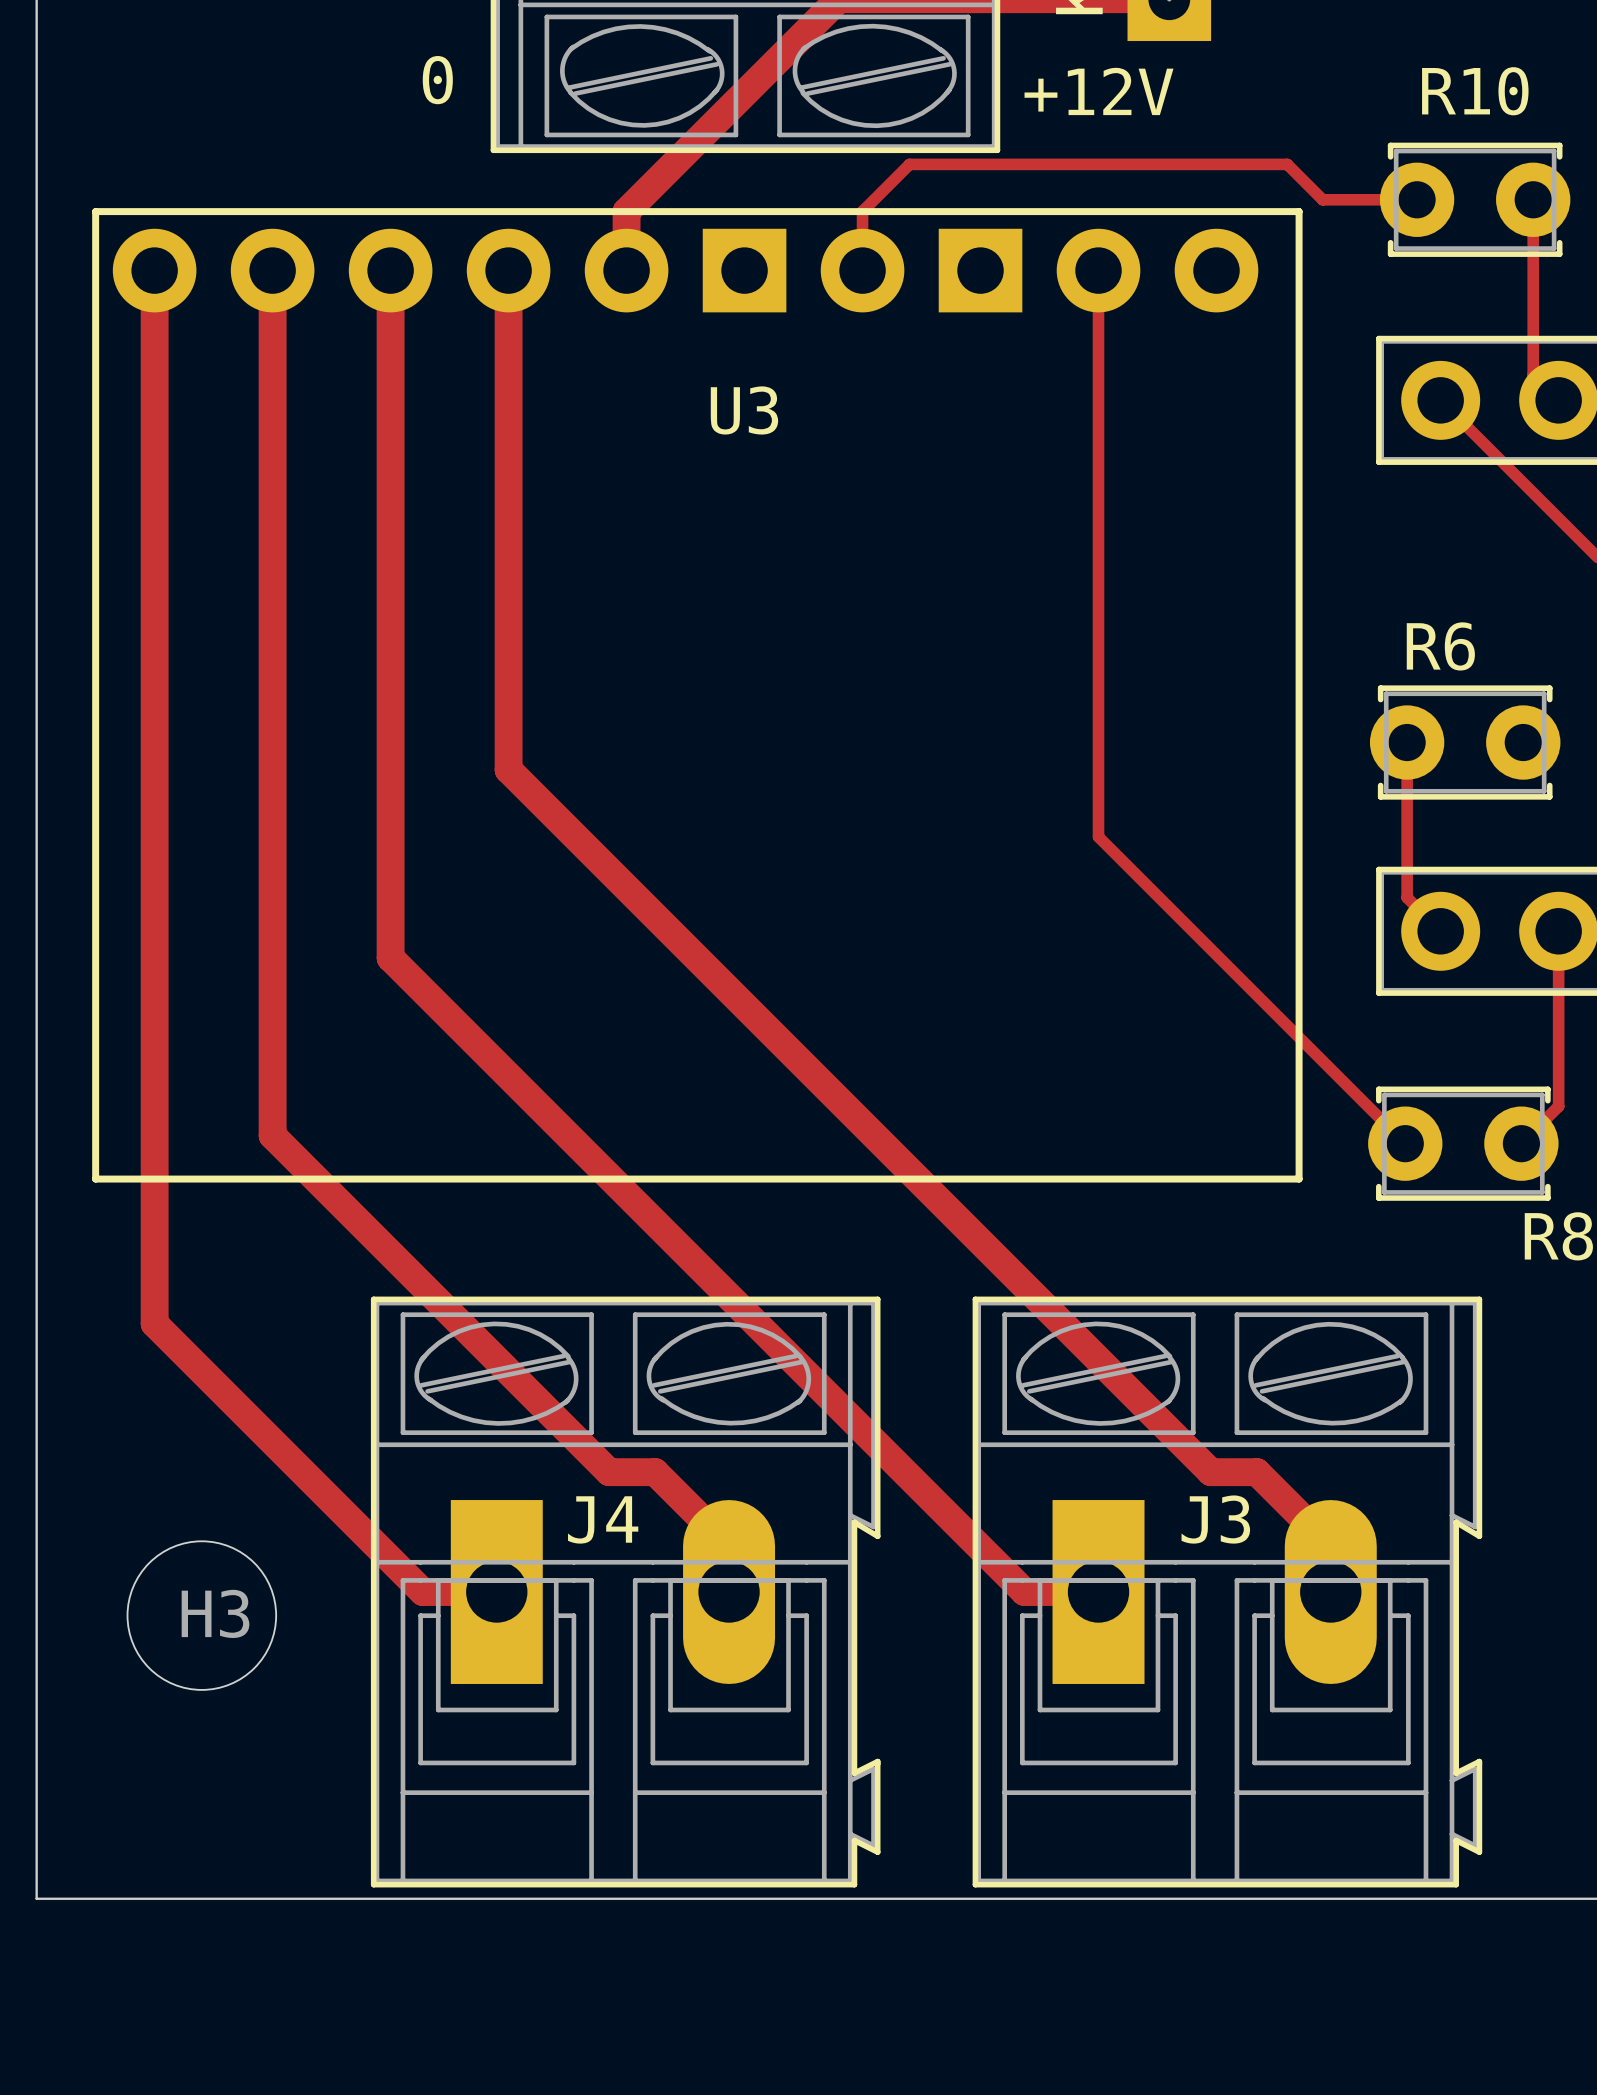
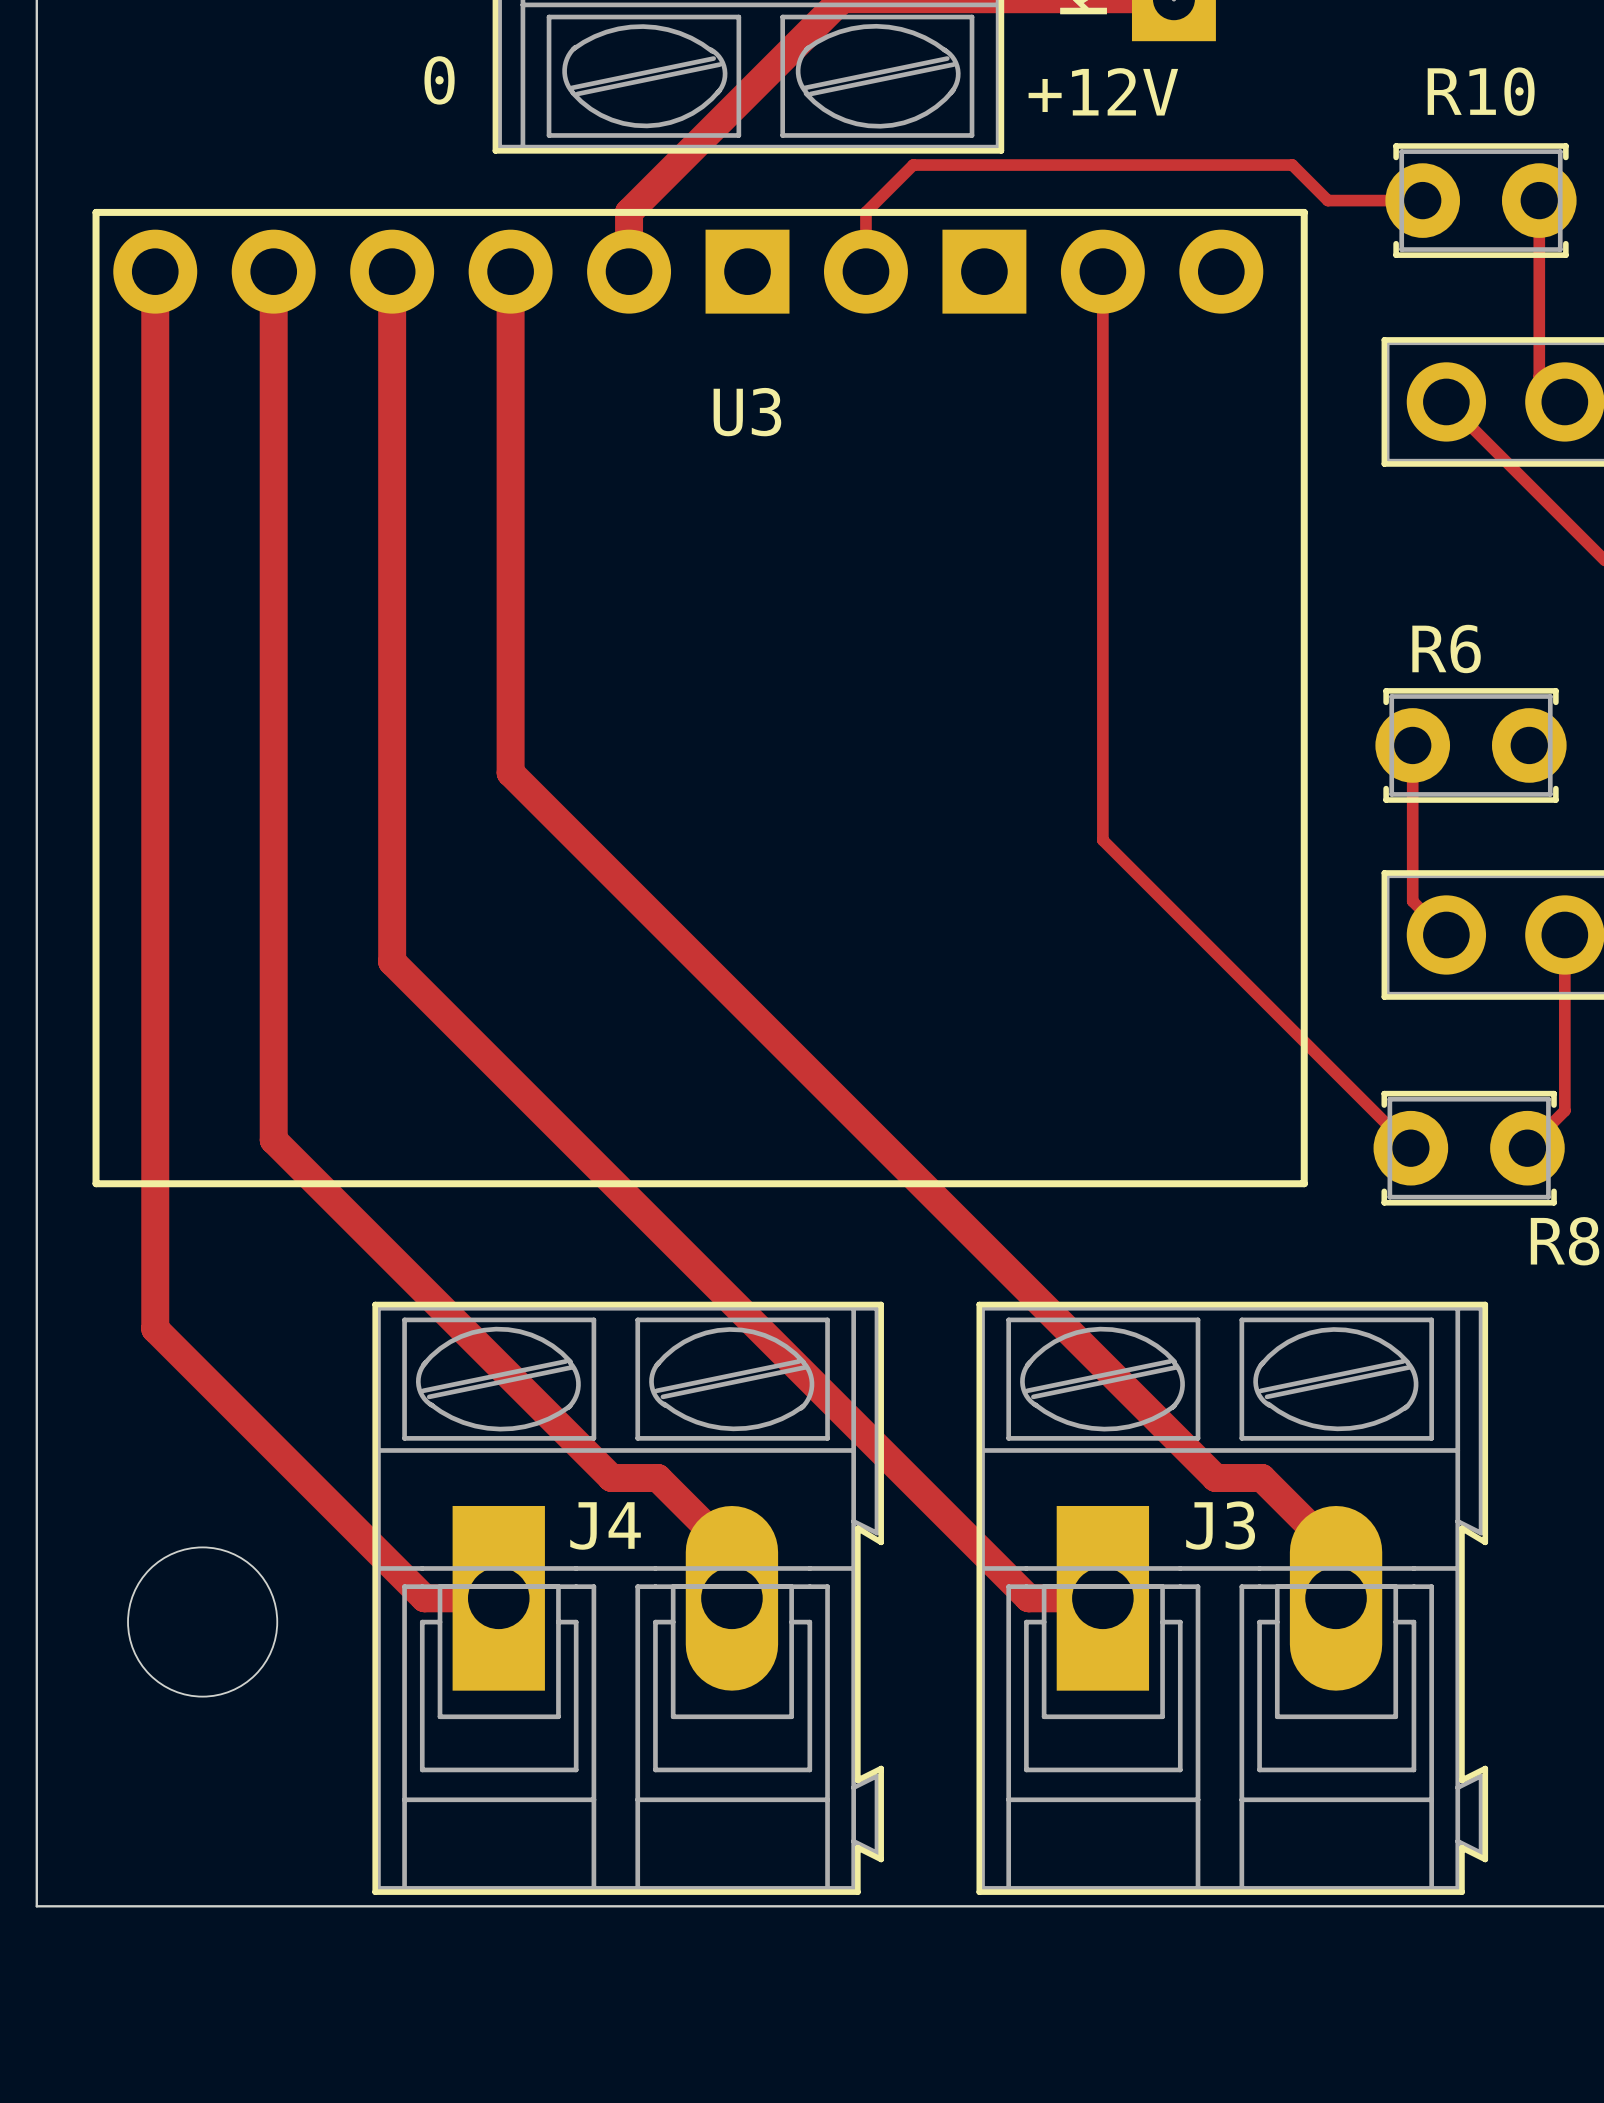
H3 name: H3 (215, 1613) -> none

